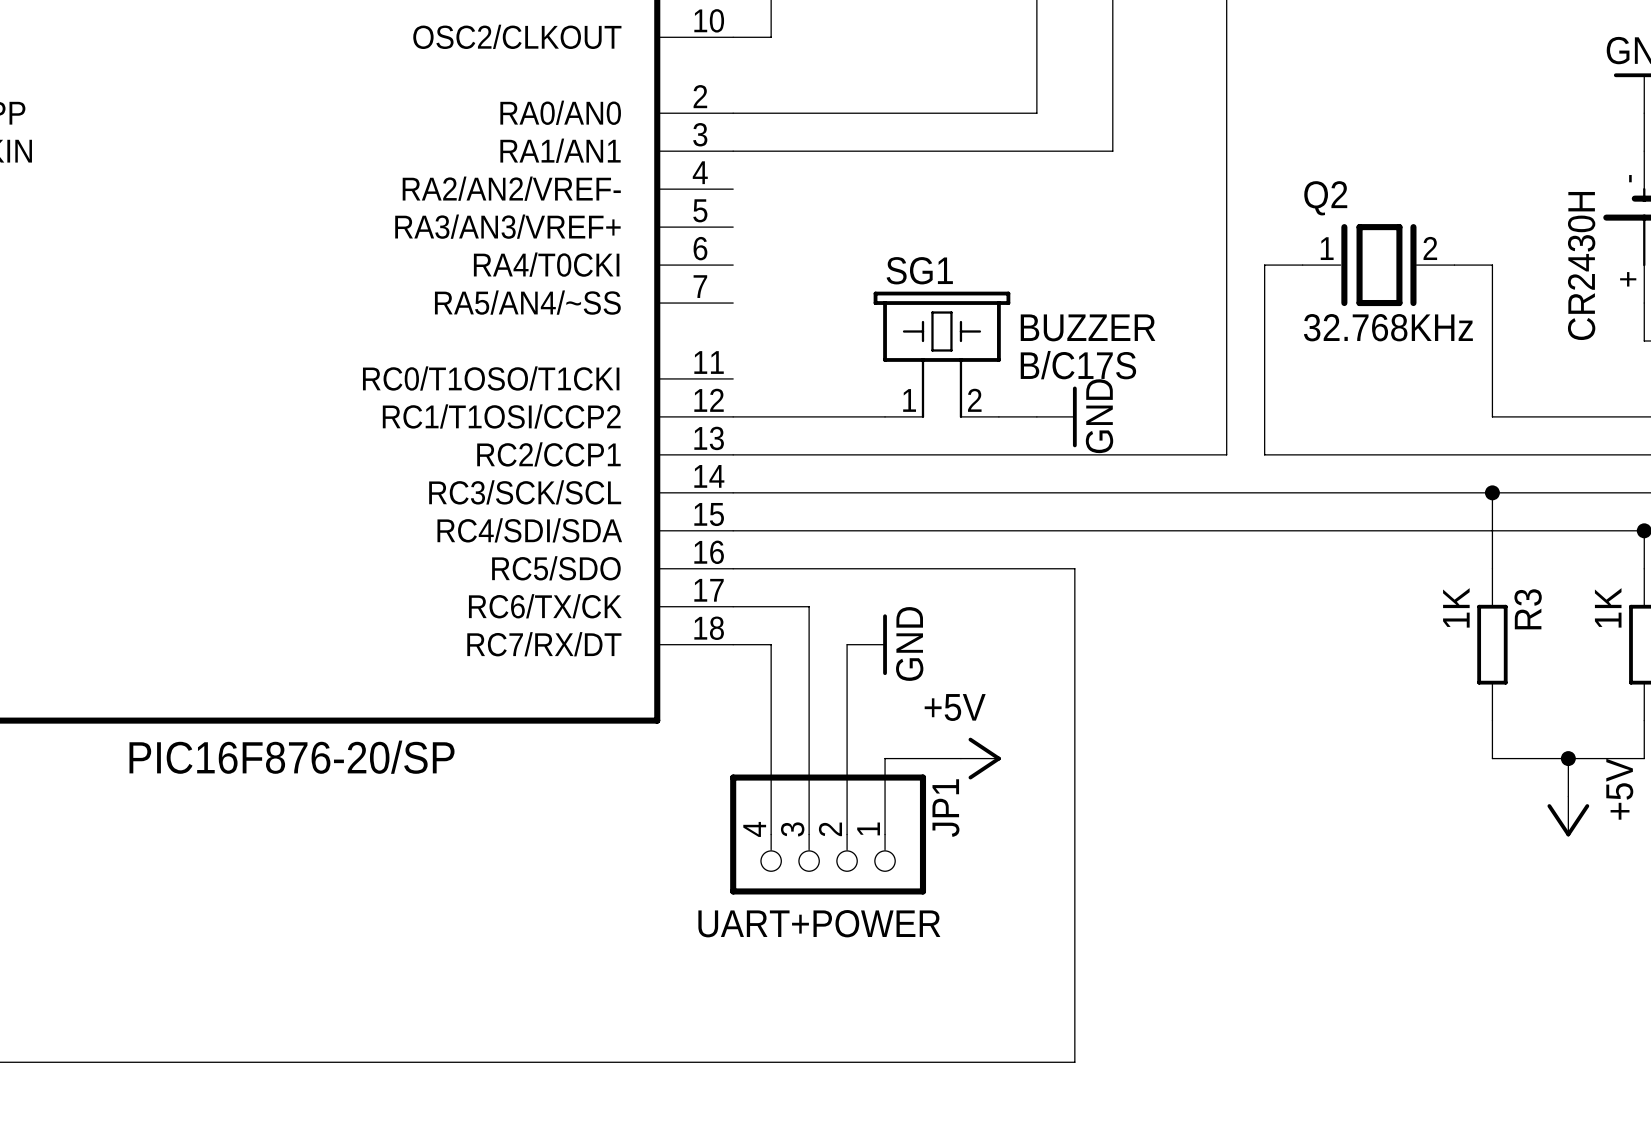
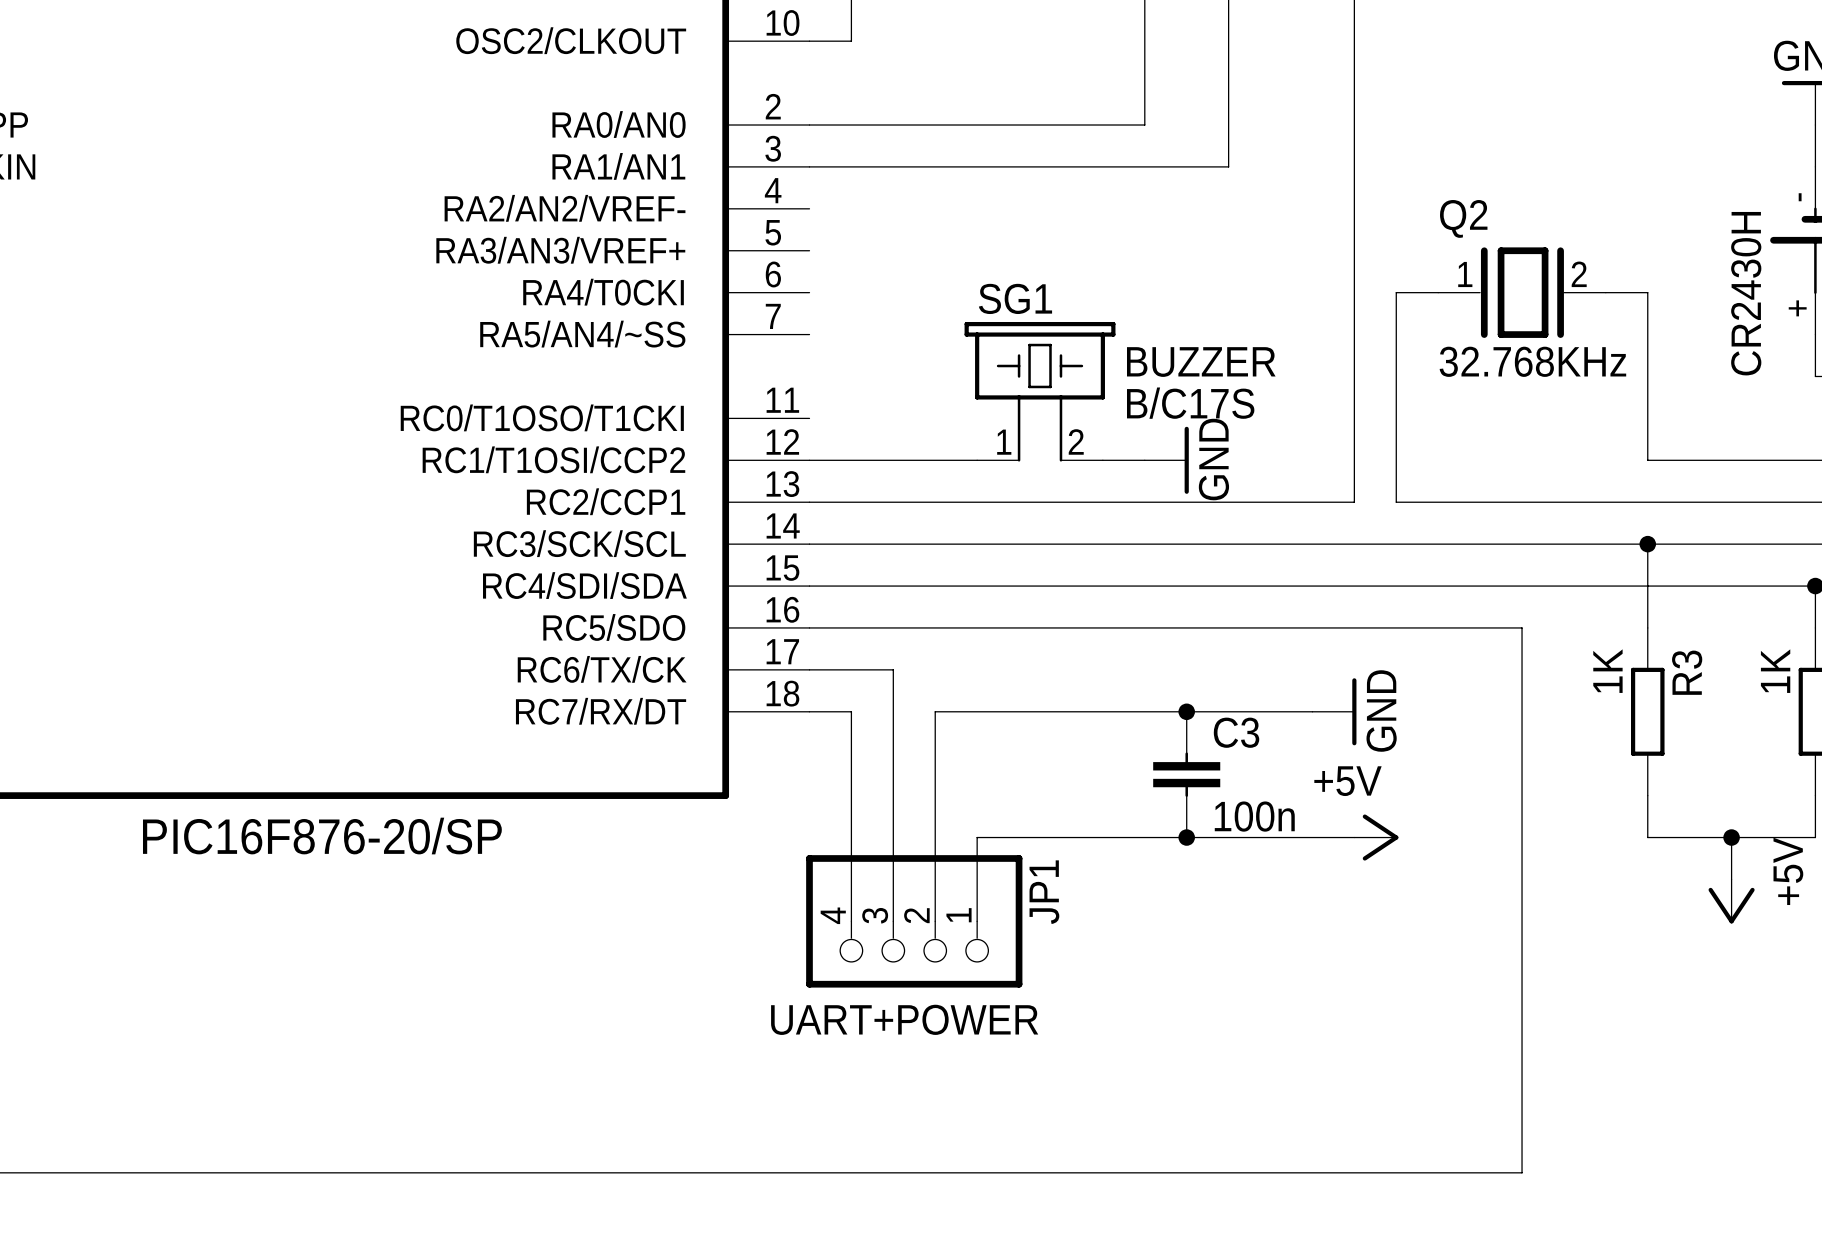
wire: (1074, 568) (1074, 1062) -> (1186, 627) (1522, 627) (1522, 1172) (1186, 1172)
wire: none -> (935, 711) (1312, 711)
power symbol position: GND (867, 644) -> GND (1334, 711)
junction: none -> (1186, 711)
C3: none -> 100n (1186, 774)
wire: none -> (1060, 837) (1354, 837)
power symbol position: +5V (980, 758) -> +5V (1376, 837)
junction: none -> (1186, 837)

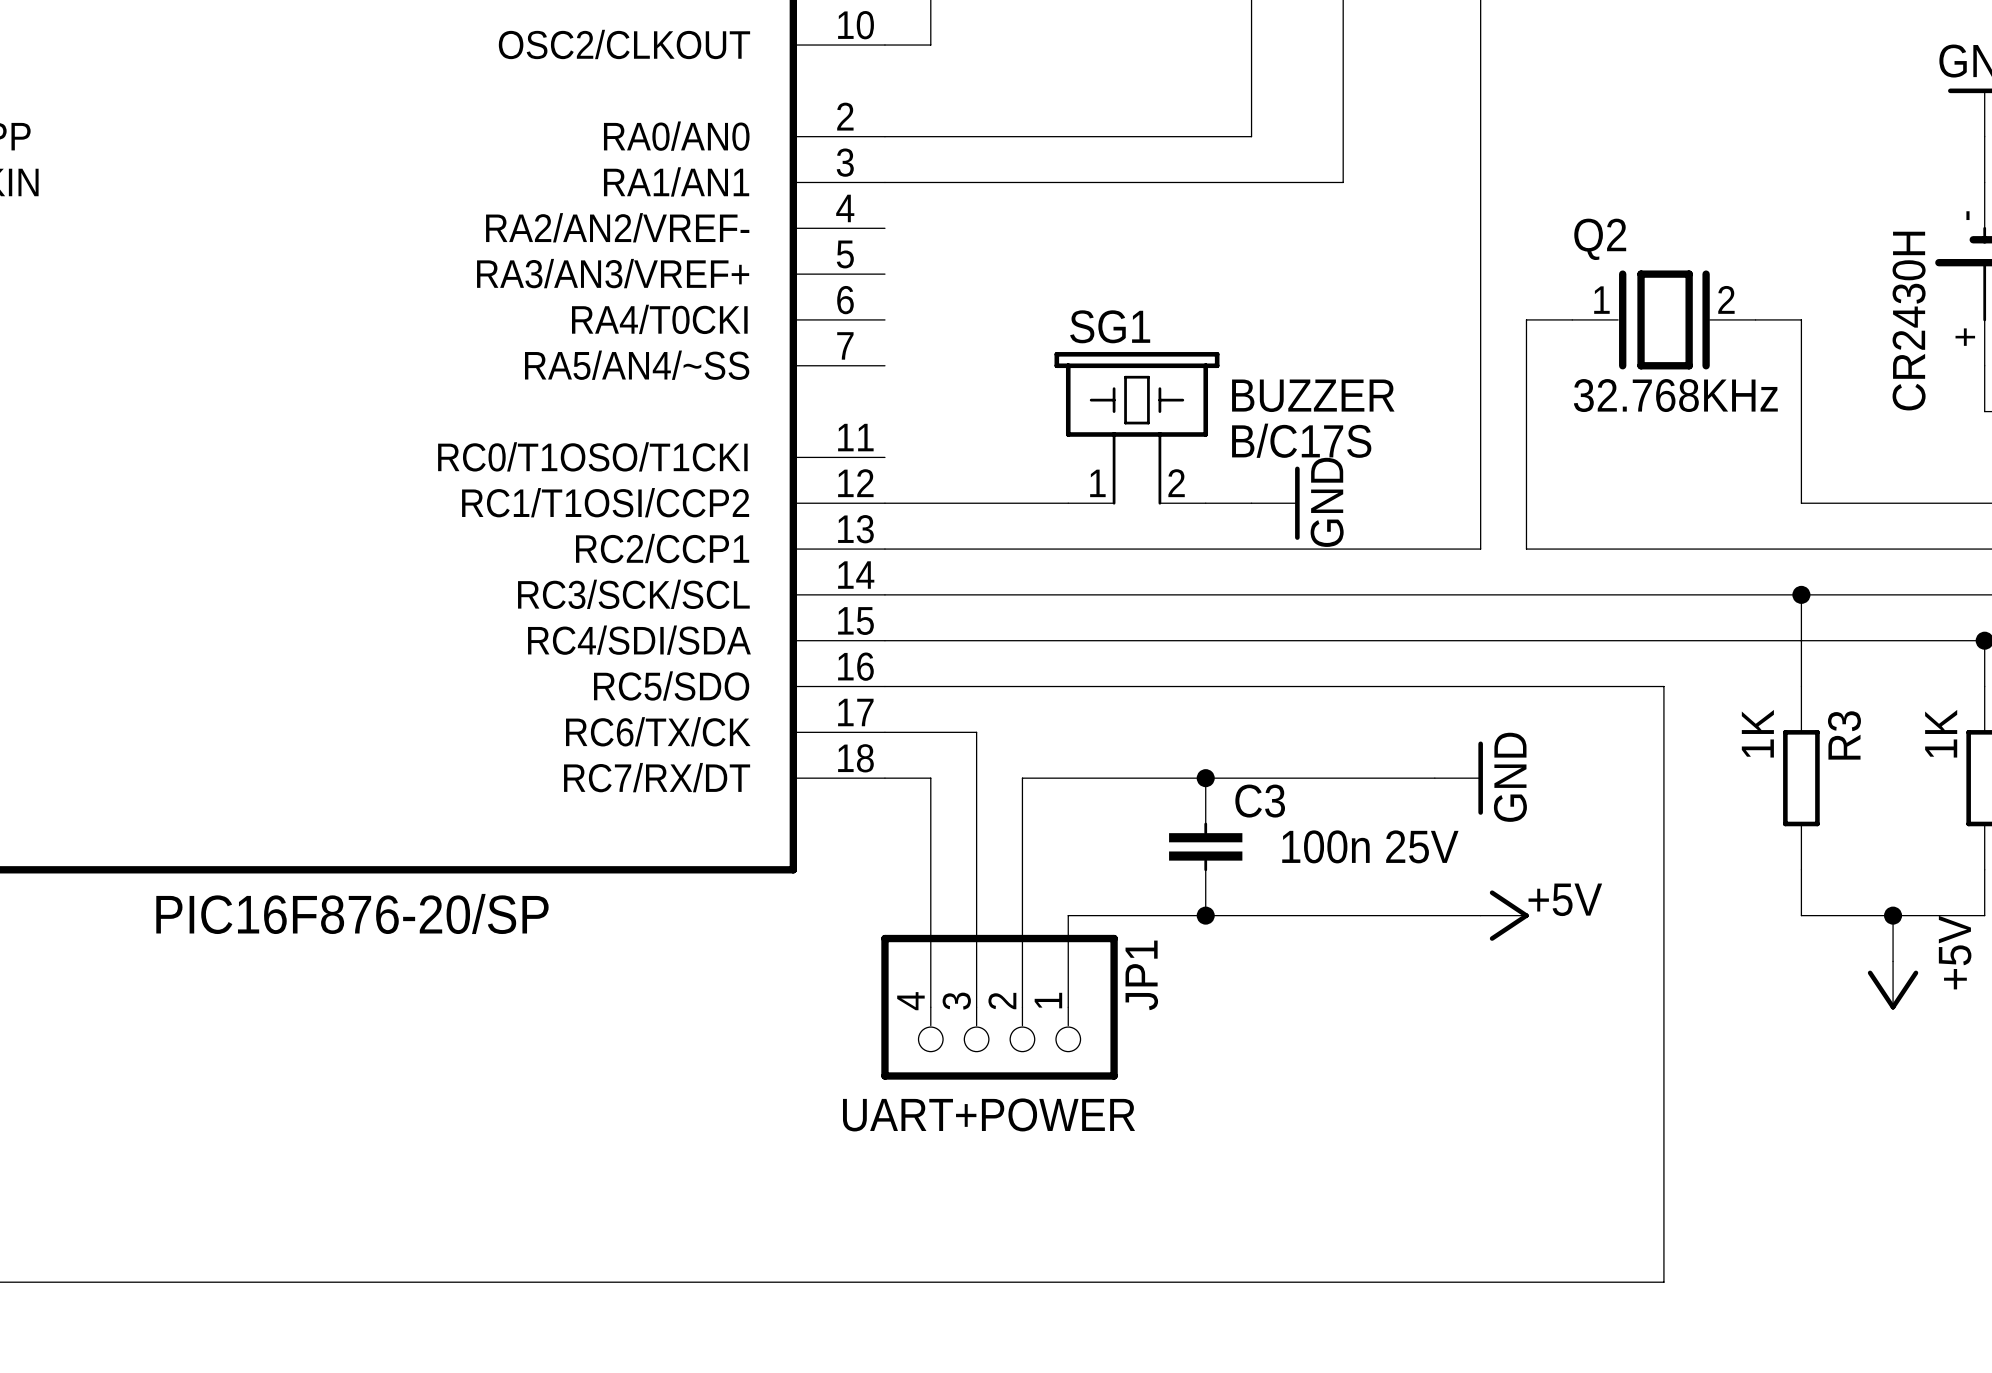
junction: none -> (1205, 778)
junction: (1186, 711) -> none
C3 position: (1186, 774) -> (1205, 846)
power symbol text position: +5V (1347, 781) -> +5V (1565, 899)
C3 value: 100n (1254, 816) -> 100n 25V (1370, 846)
junction: none -> (1205, 915)
junction: (1186, 837) -> none

